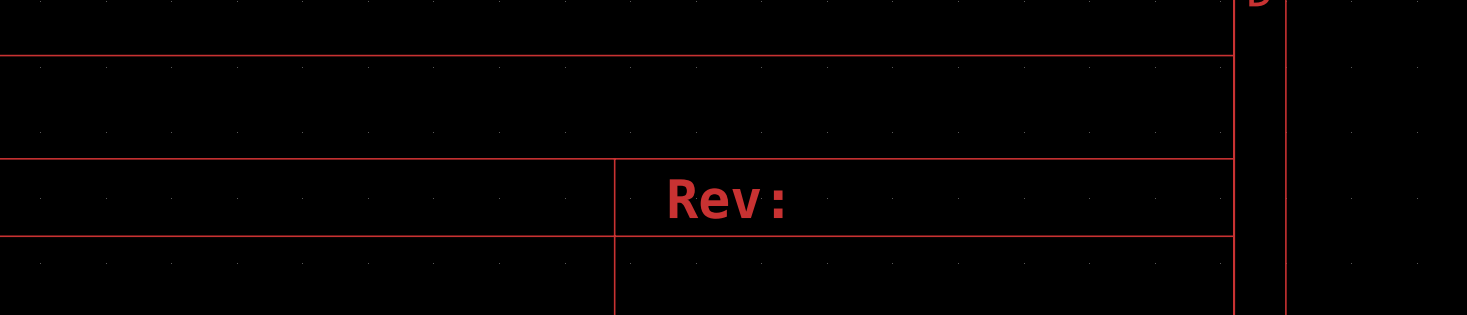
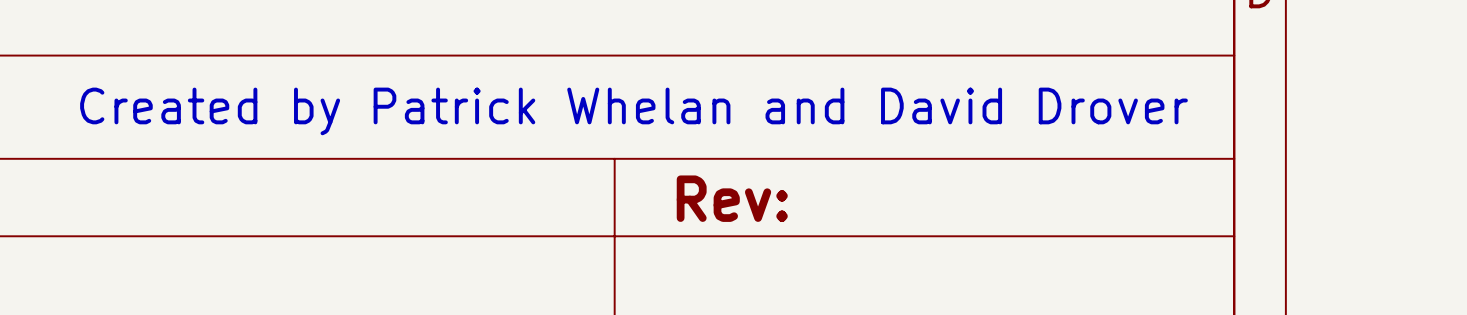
text: none -> Created by Patrick Whelan and David Drover (633, 111)

